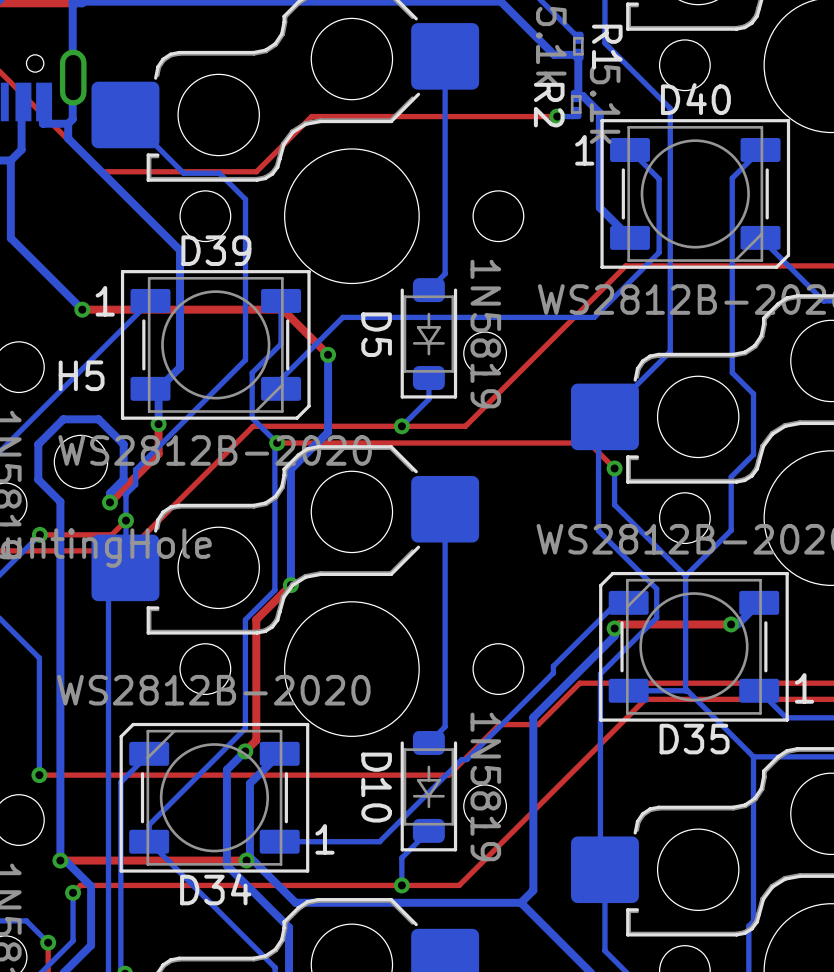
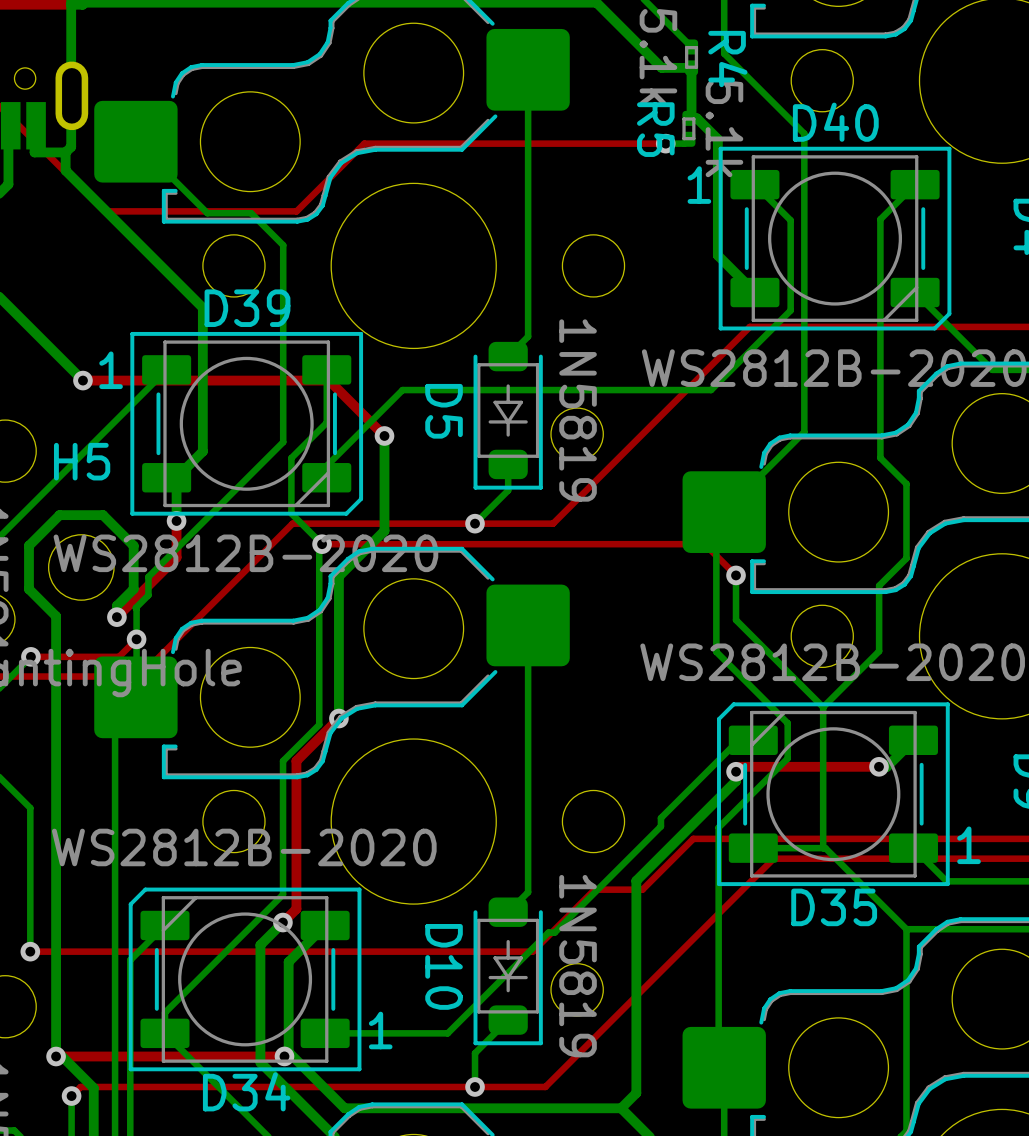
R1 name: R1 (607, 46) -> R4 (727, 59)
R2 name: R2 (549, 105) -> R5 (655, 129)

